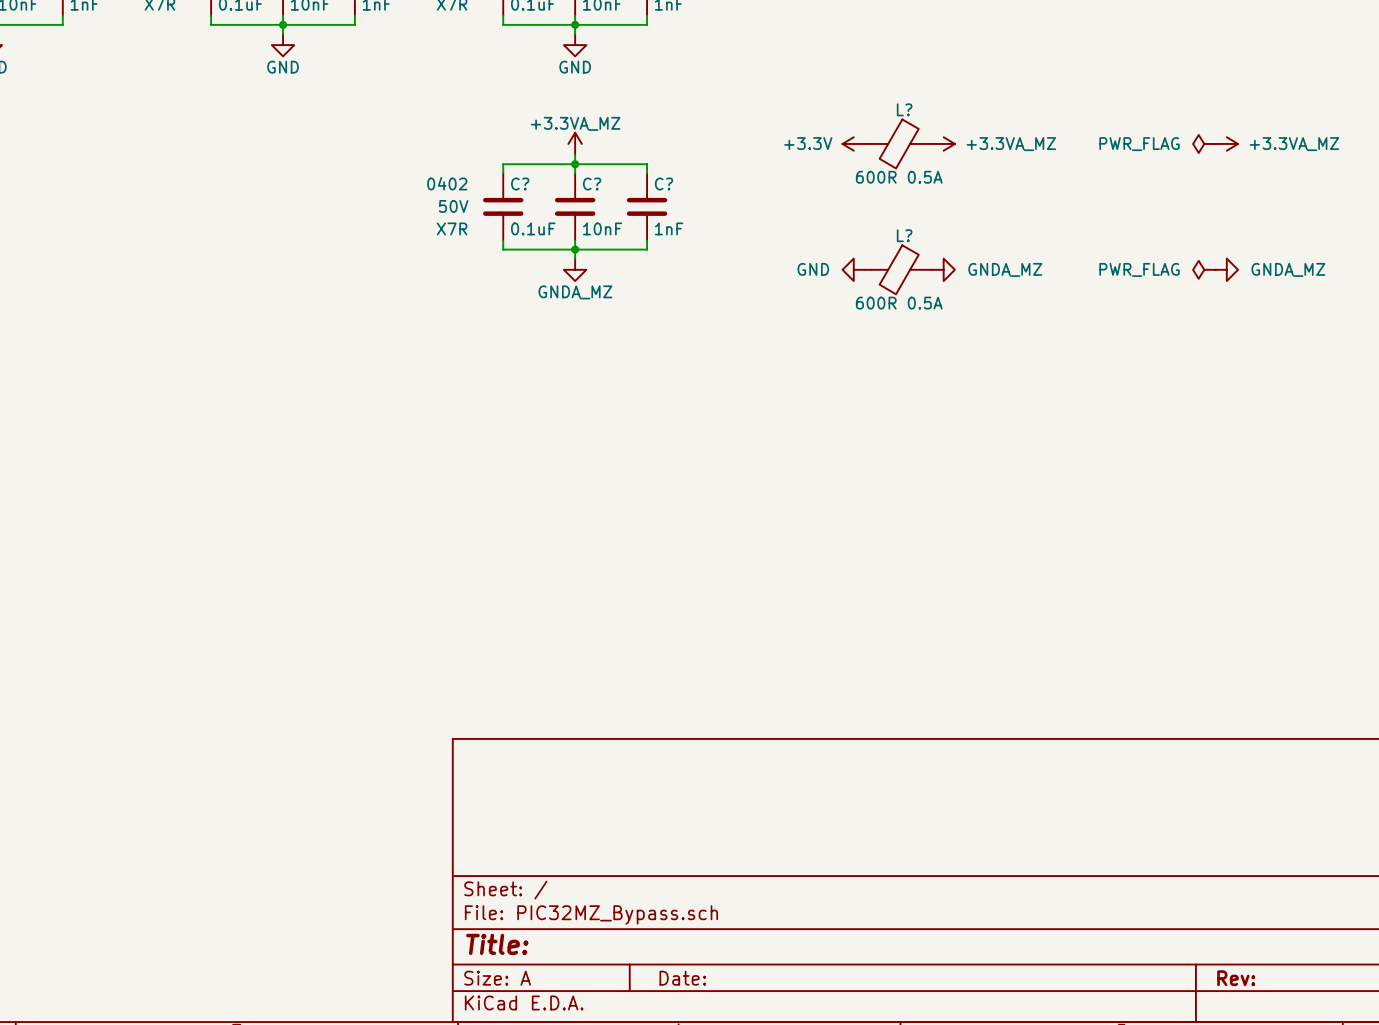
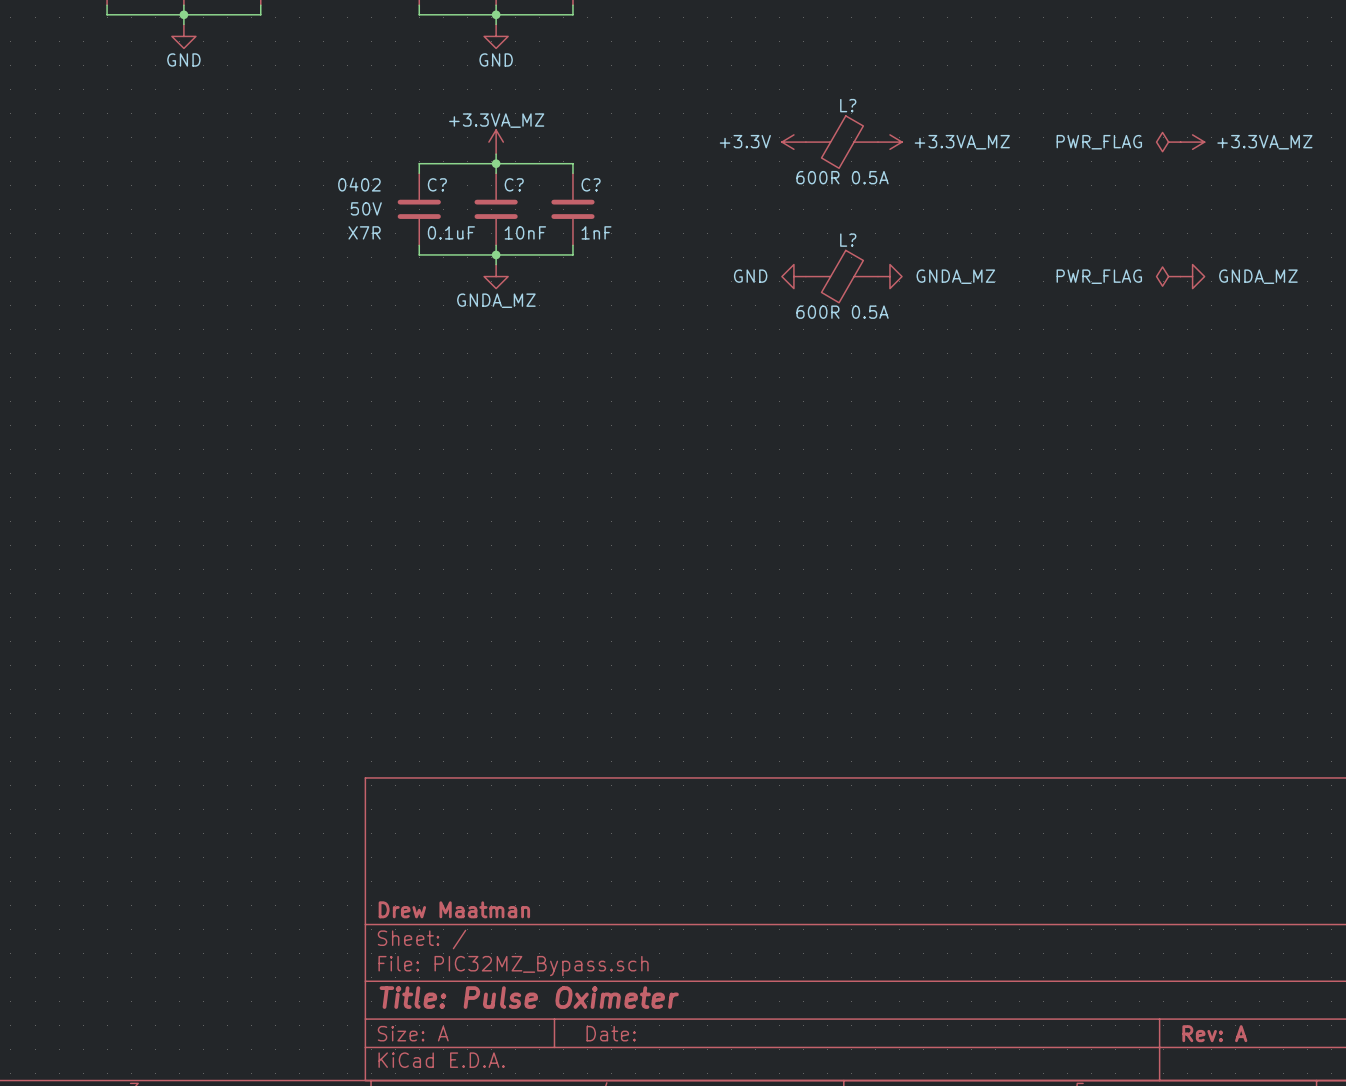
title block: none -> Drew Maatman (454, 909)
title block: Title: (497, 944) -> Title: Pulse Oximeter (529, 997)
title block: Rev: (1236, 978) -> Rev: A (1214, 1033)

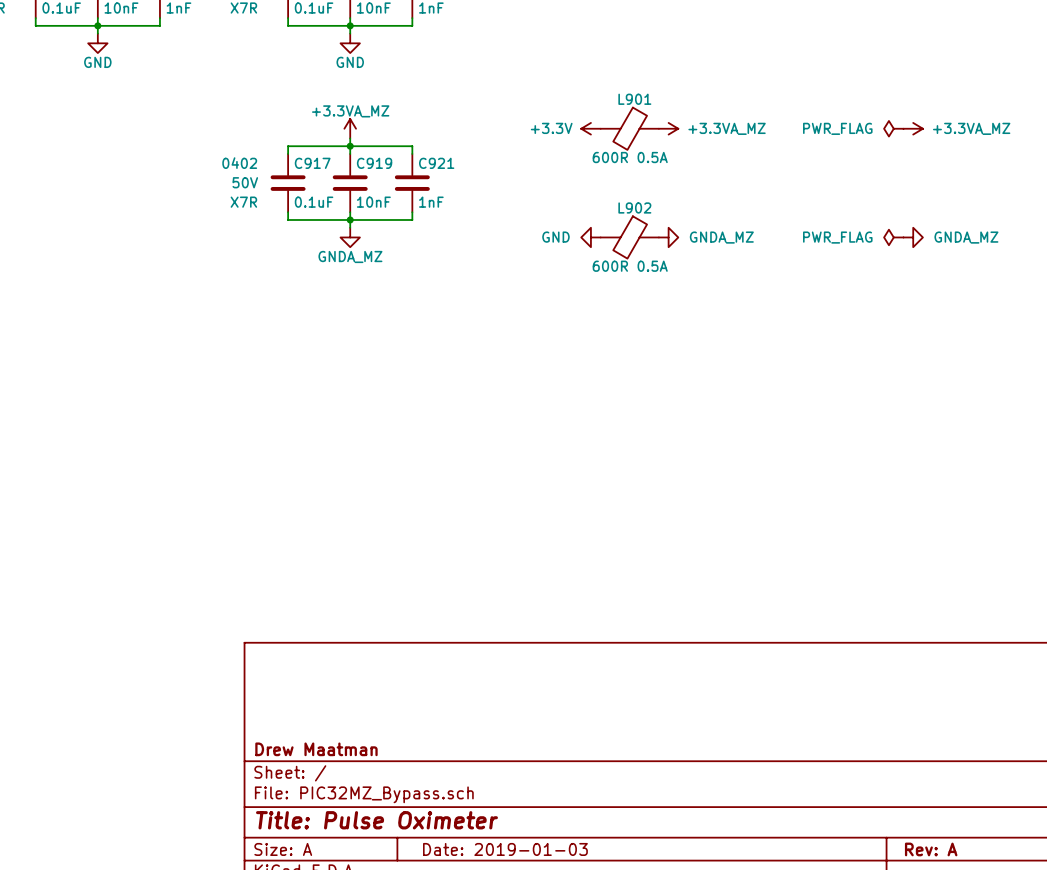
L? name: L? (848, 105) -> L901 (634, 99)
C? name: C? (437, 184) -> C917 (312, 163)
C? name: C? (514, 184) -> C919 (374, 163)
C? name: C? (591, 184) -> C921 (436, 163)
L? name: L? (848, 240) -> L902 (634, 207)
title block: Date: (611, 1033) -> Date: 2019-01-03 (505, 849)

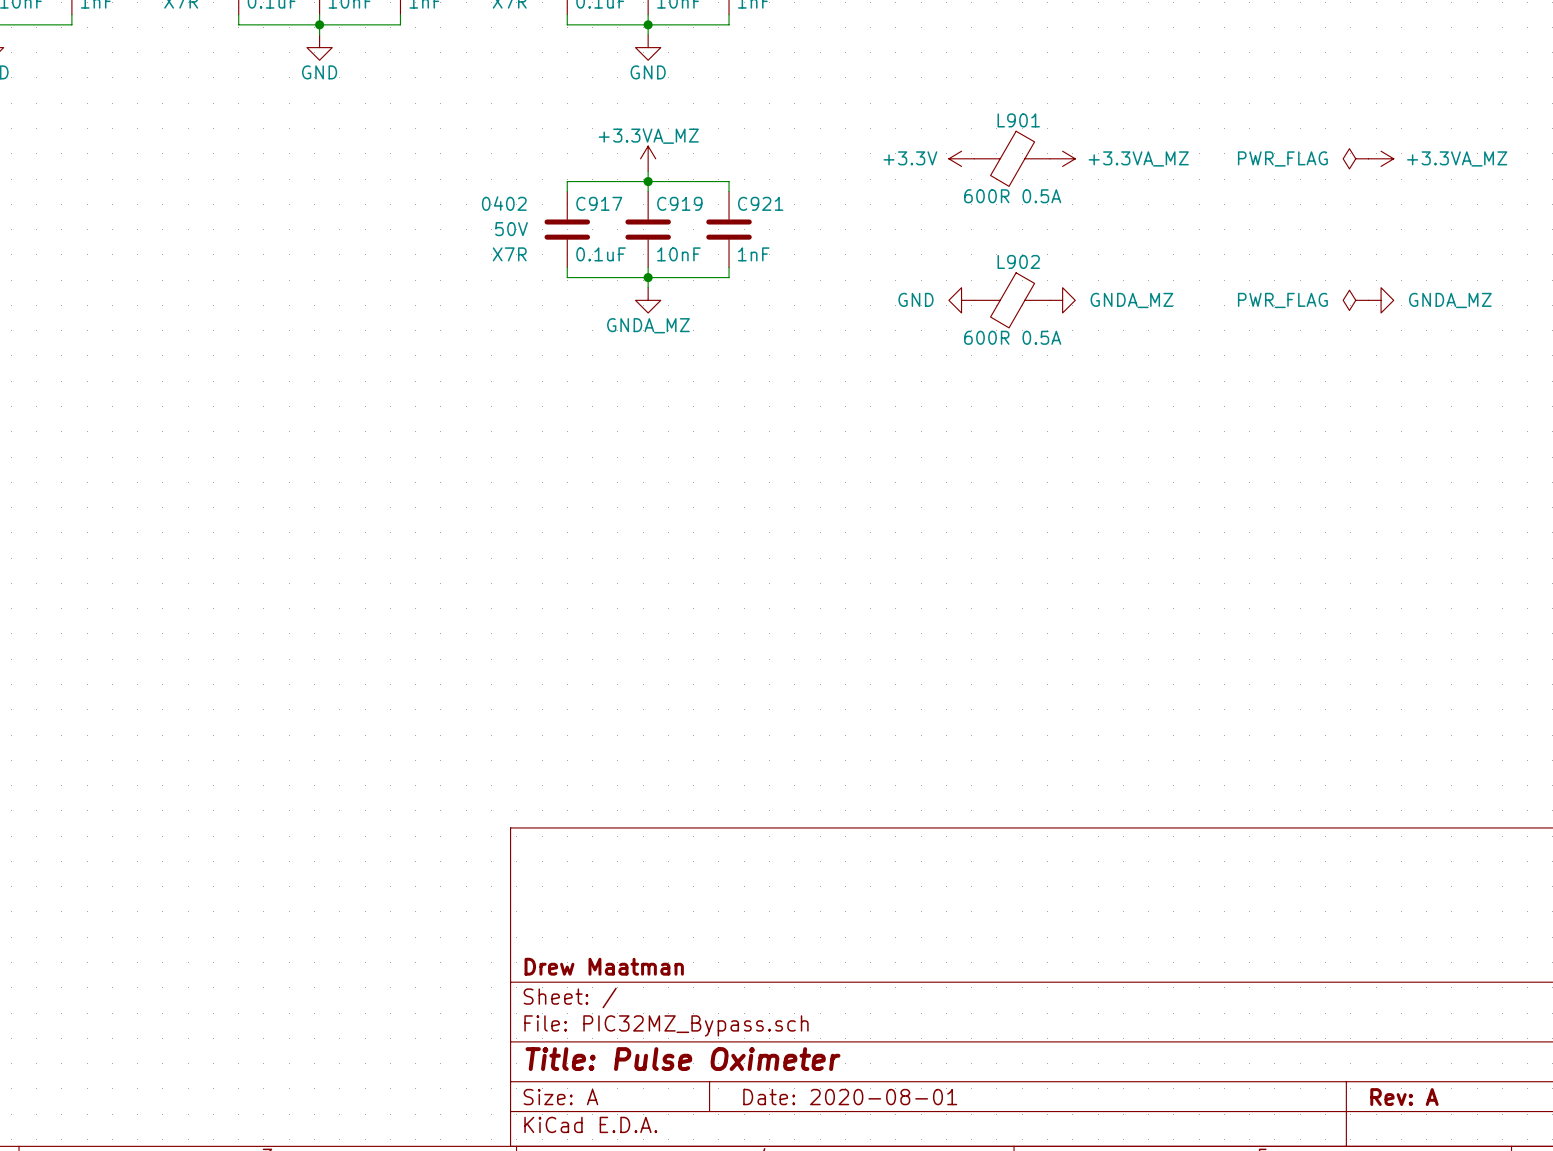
title block: Date: 2019-01-03 (505, 849) -> Date: 2020-08-01 (850, 1097)

